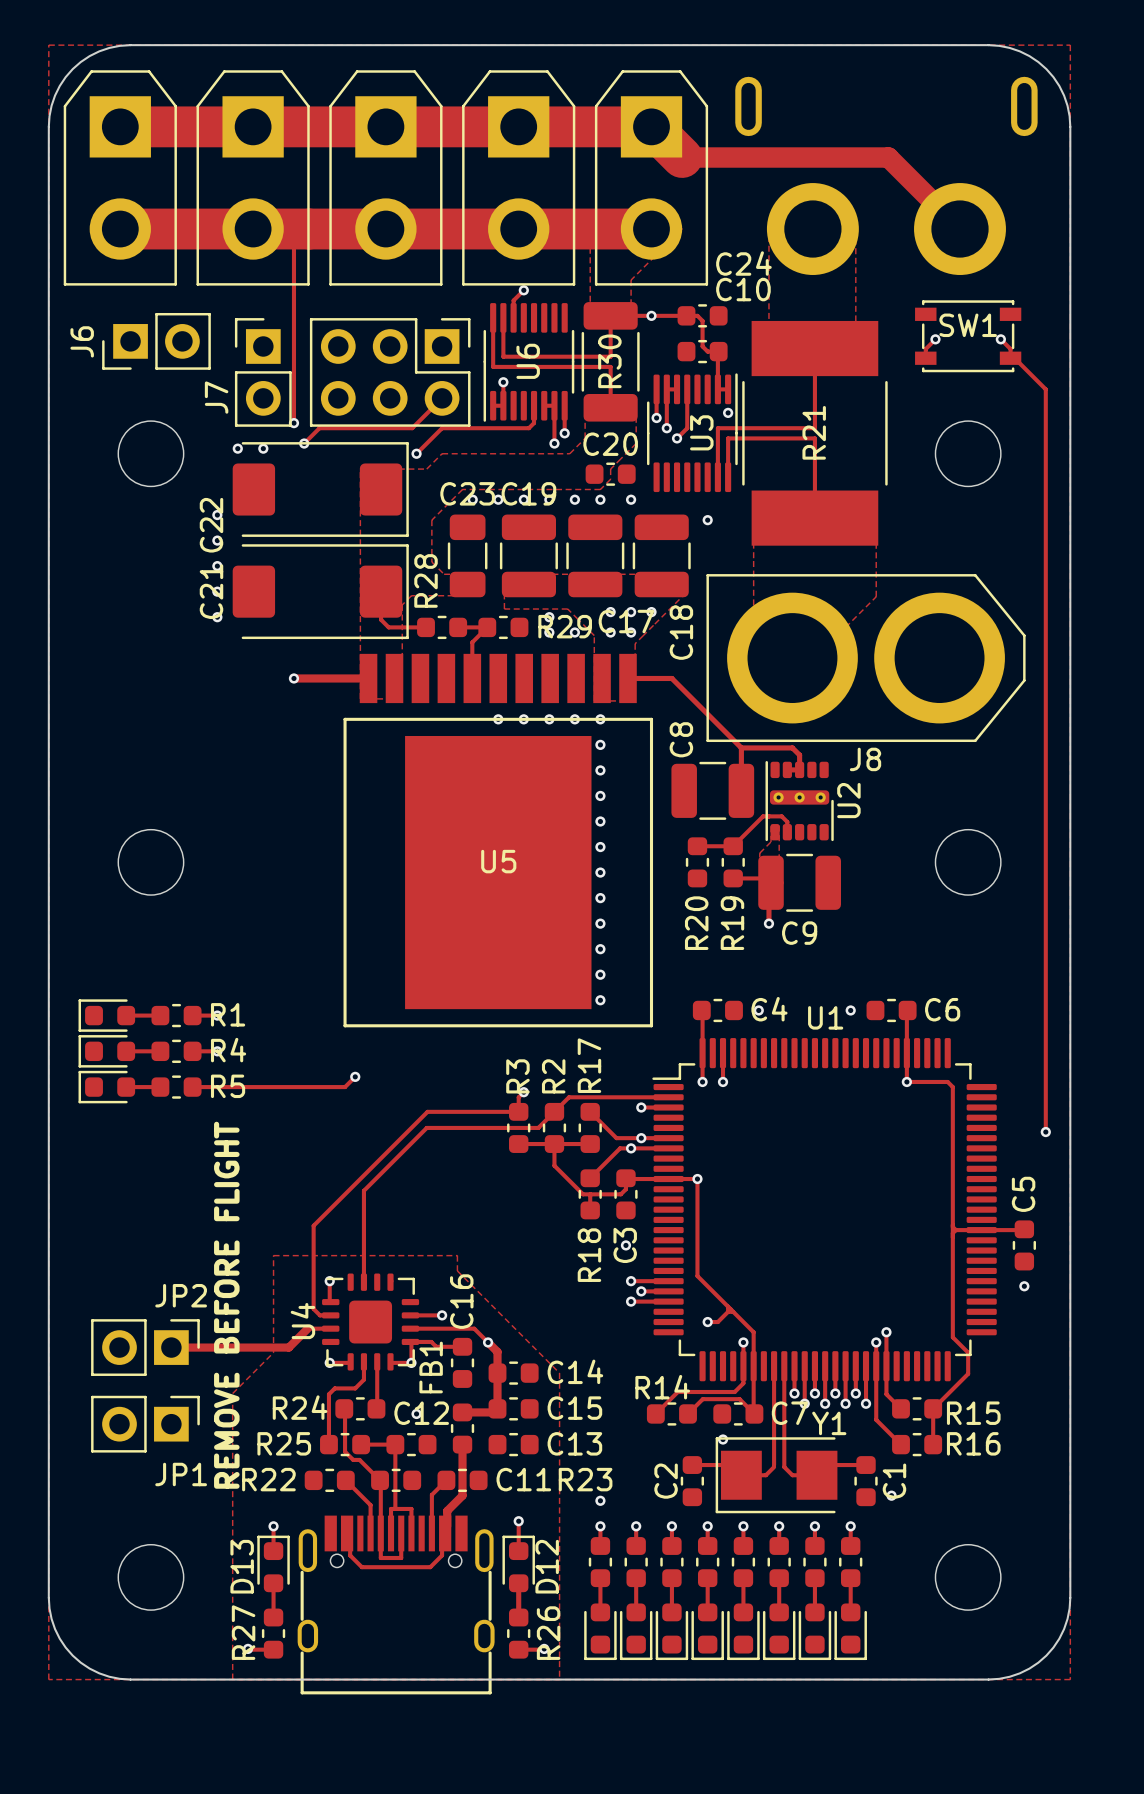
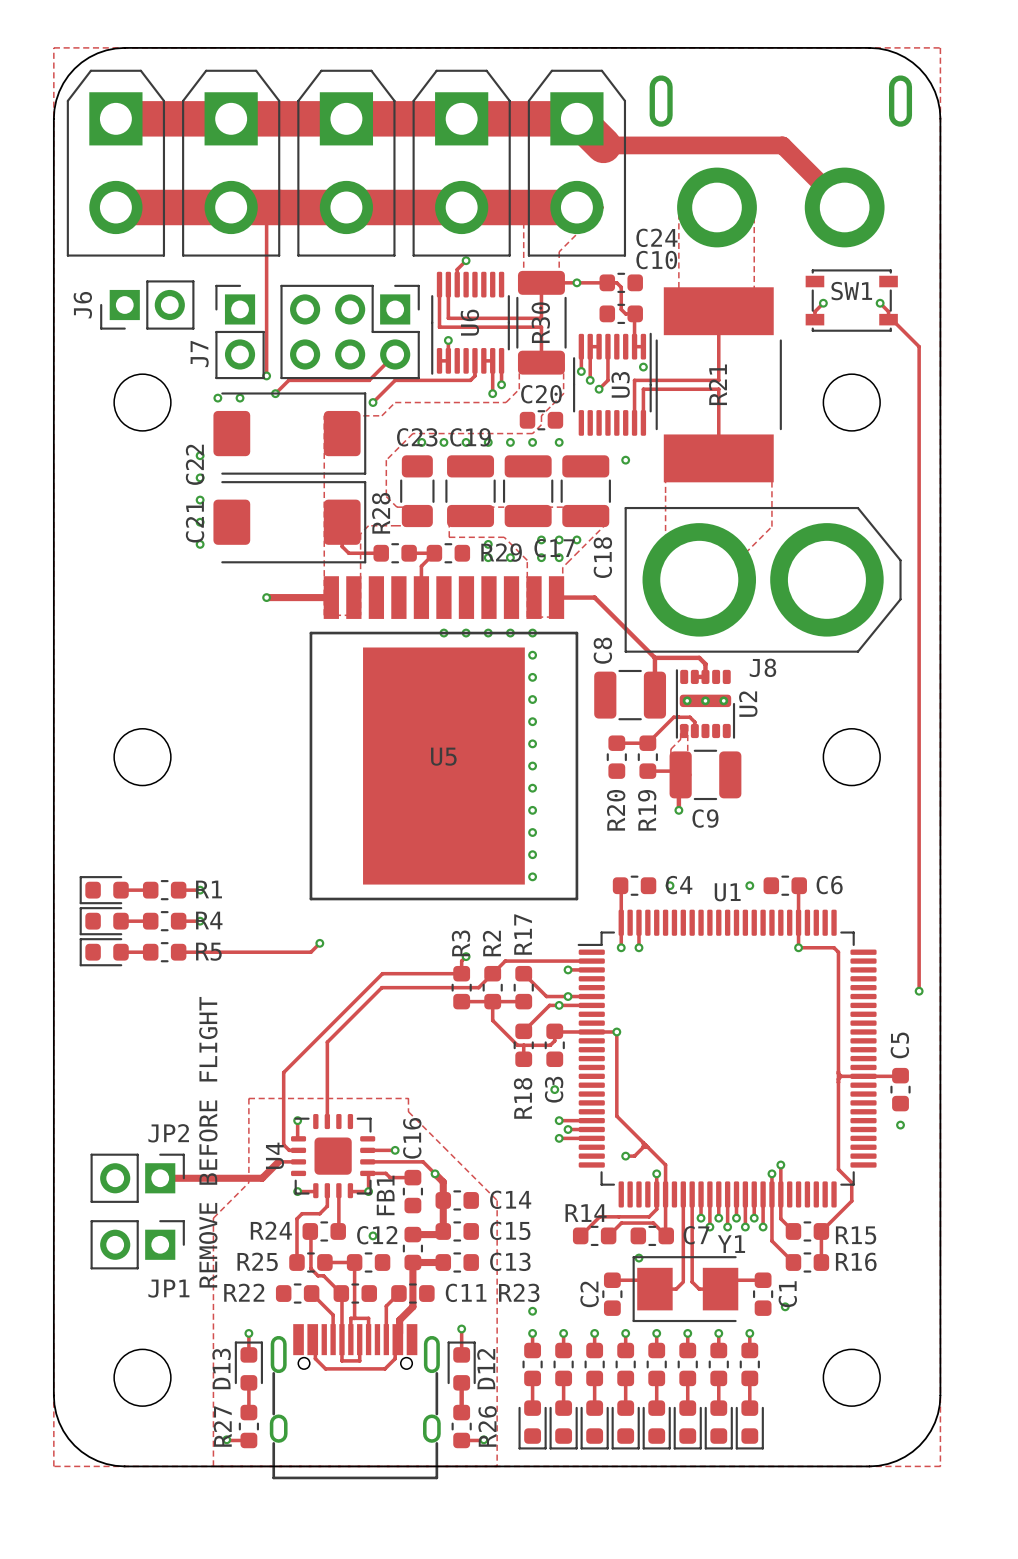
track: none -> (412, 1262) (443, 1262)

